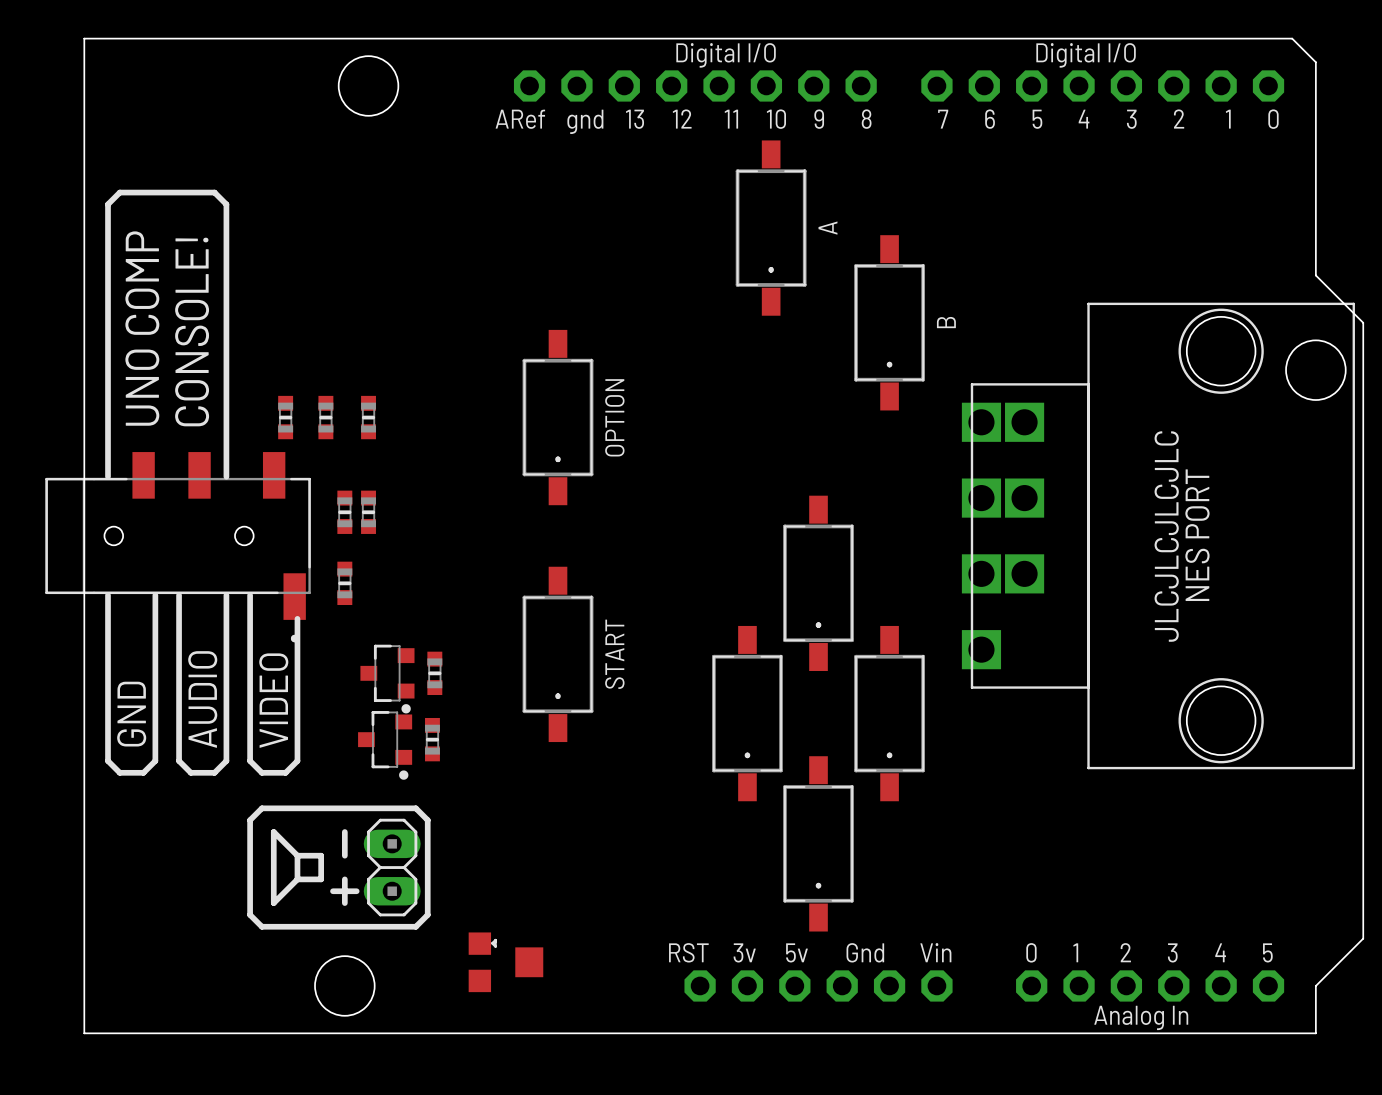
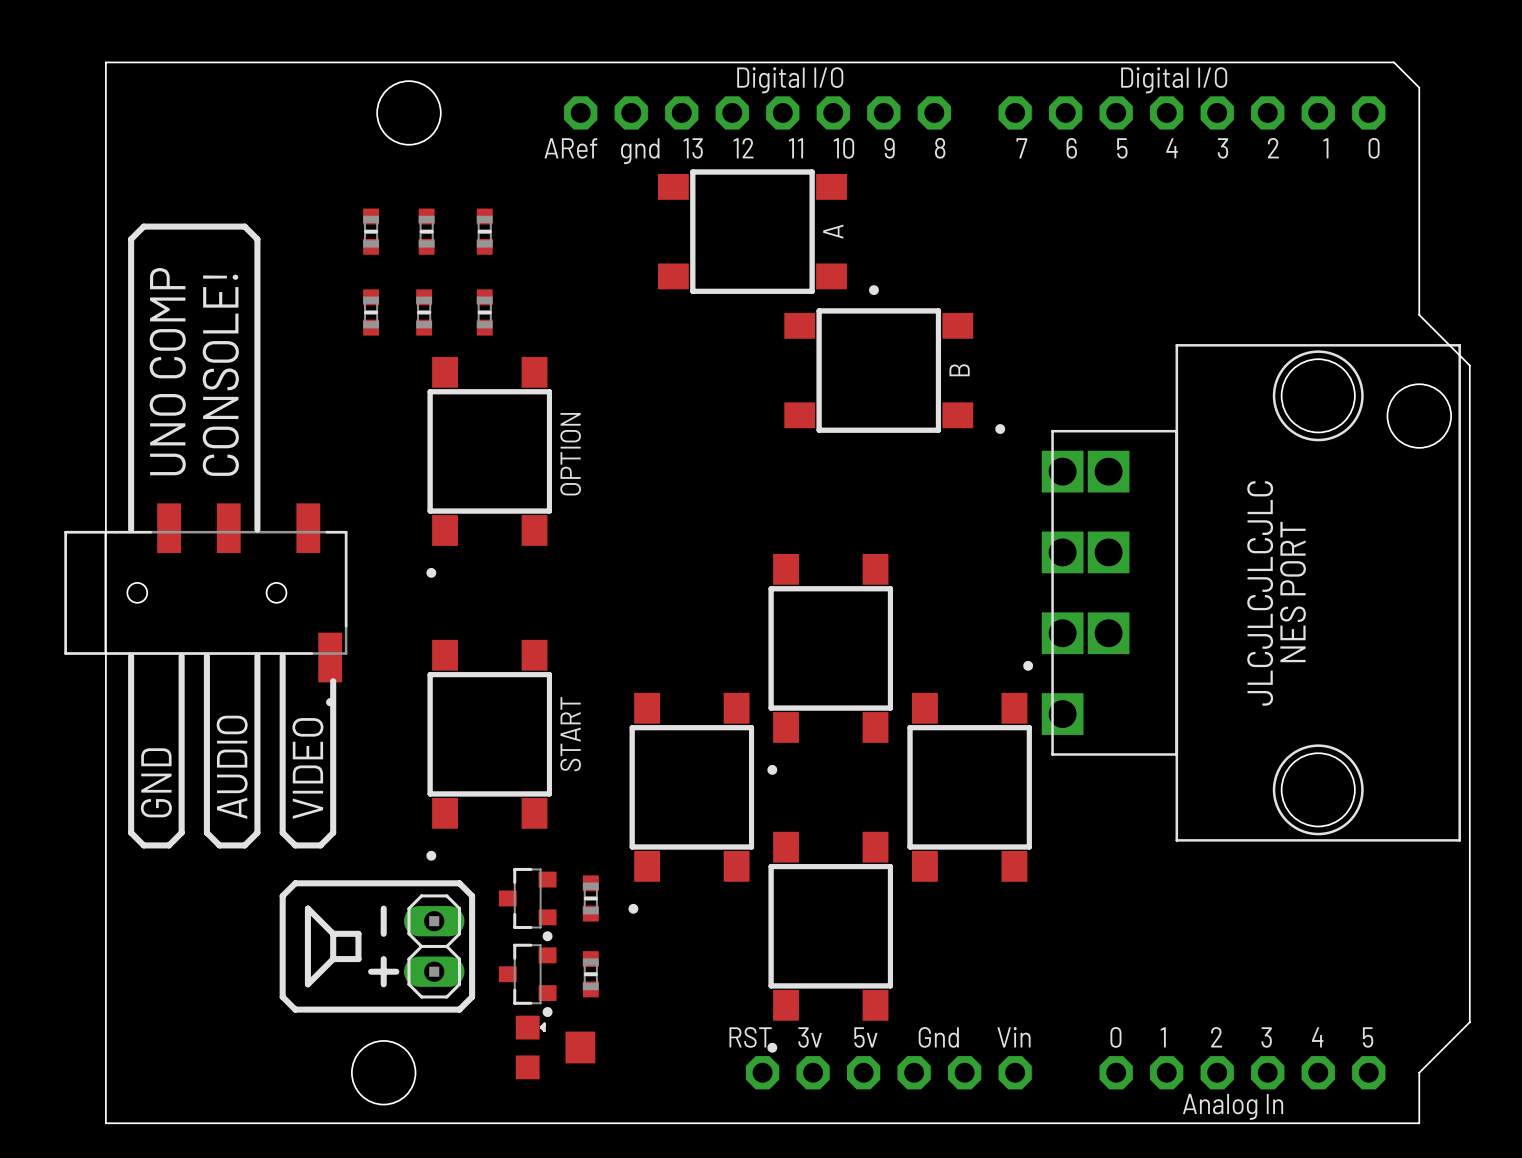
part: none -> (371, 231)
part: none -> (426, 231)
part: none -> (484, 231)
part: none -> (768, 232)
part: (771, 228) -> none
text position: A (827, 228) -> A (833, 231)
part: none -> (371, 312)
part: none -> (424, 312)
part: none -> (484, 312)
part: (889, 322) -> none
text position: B (946, 322) -> B (959, 370)
part: none -> (894, 371)
part: (285, 417) -> none
part: (325, 417) -> none
part: (368, 417) -> none
part: (557, 417) -> none
text position: OPTION (614, 417) -> OPTION (570, 454)
part: none -> (489, 467)
part: (344, 512) -> none
part: (368, 512) -> none
part: (344, 583) -> none
part: (818, 583) -> none
part: none -> (830, 664)
part footprint: [854, 625, 926, 802] -> [907, 660, 1034, 882]
part footprint: [427, 651, 443, 696] -> [426, 639, 552, 861]
part: (557, 654) -> none
text position: START (614, 654) -> START (570, 734)
part: (387, 679) -> none
part: (747, 713) -> none
part: none -> (691, 803)
part: (432, 739) -> none
part: (385, 745) -> none
part: none -> (590, 898)
part: none -> (527, 904)
part: (818, 843) -> none
part: none -> (830, 942)
part: none -> (590, 974)
part: none -> (527, 980)

